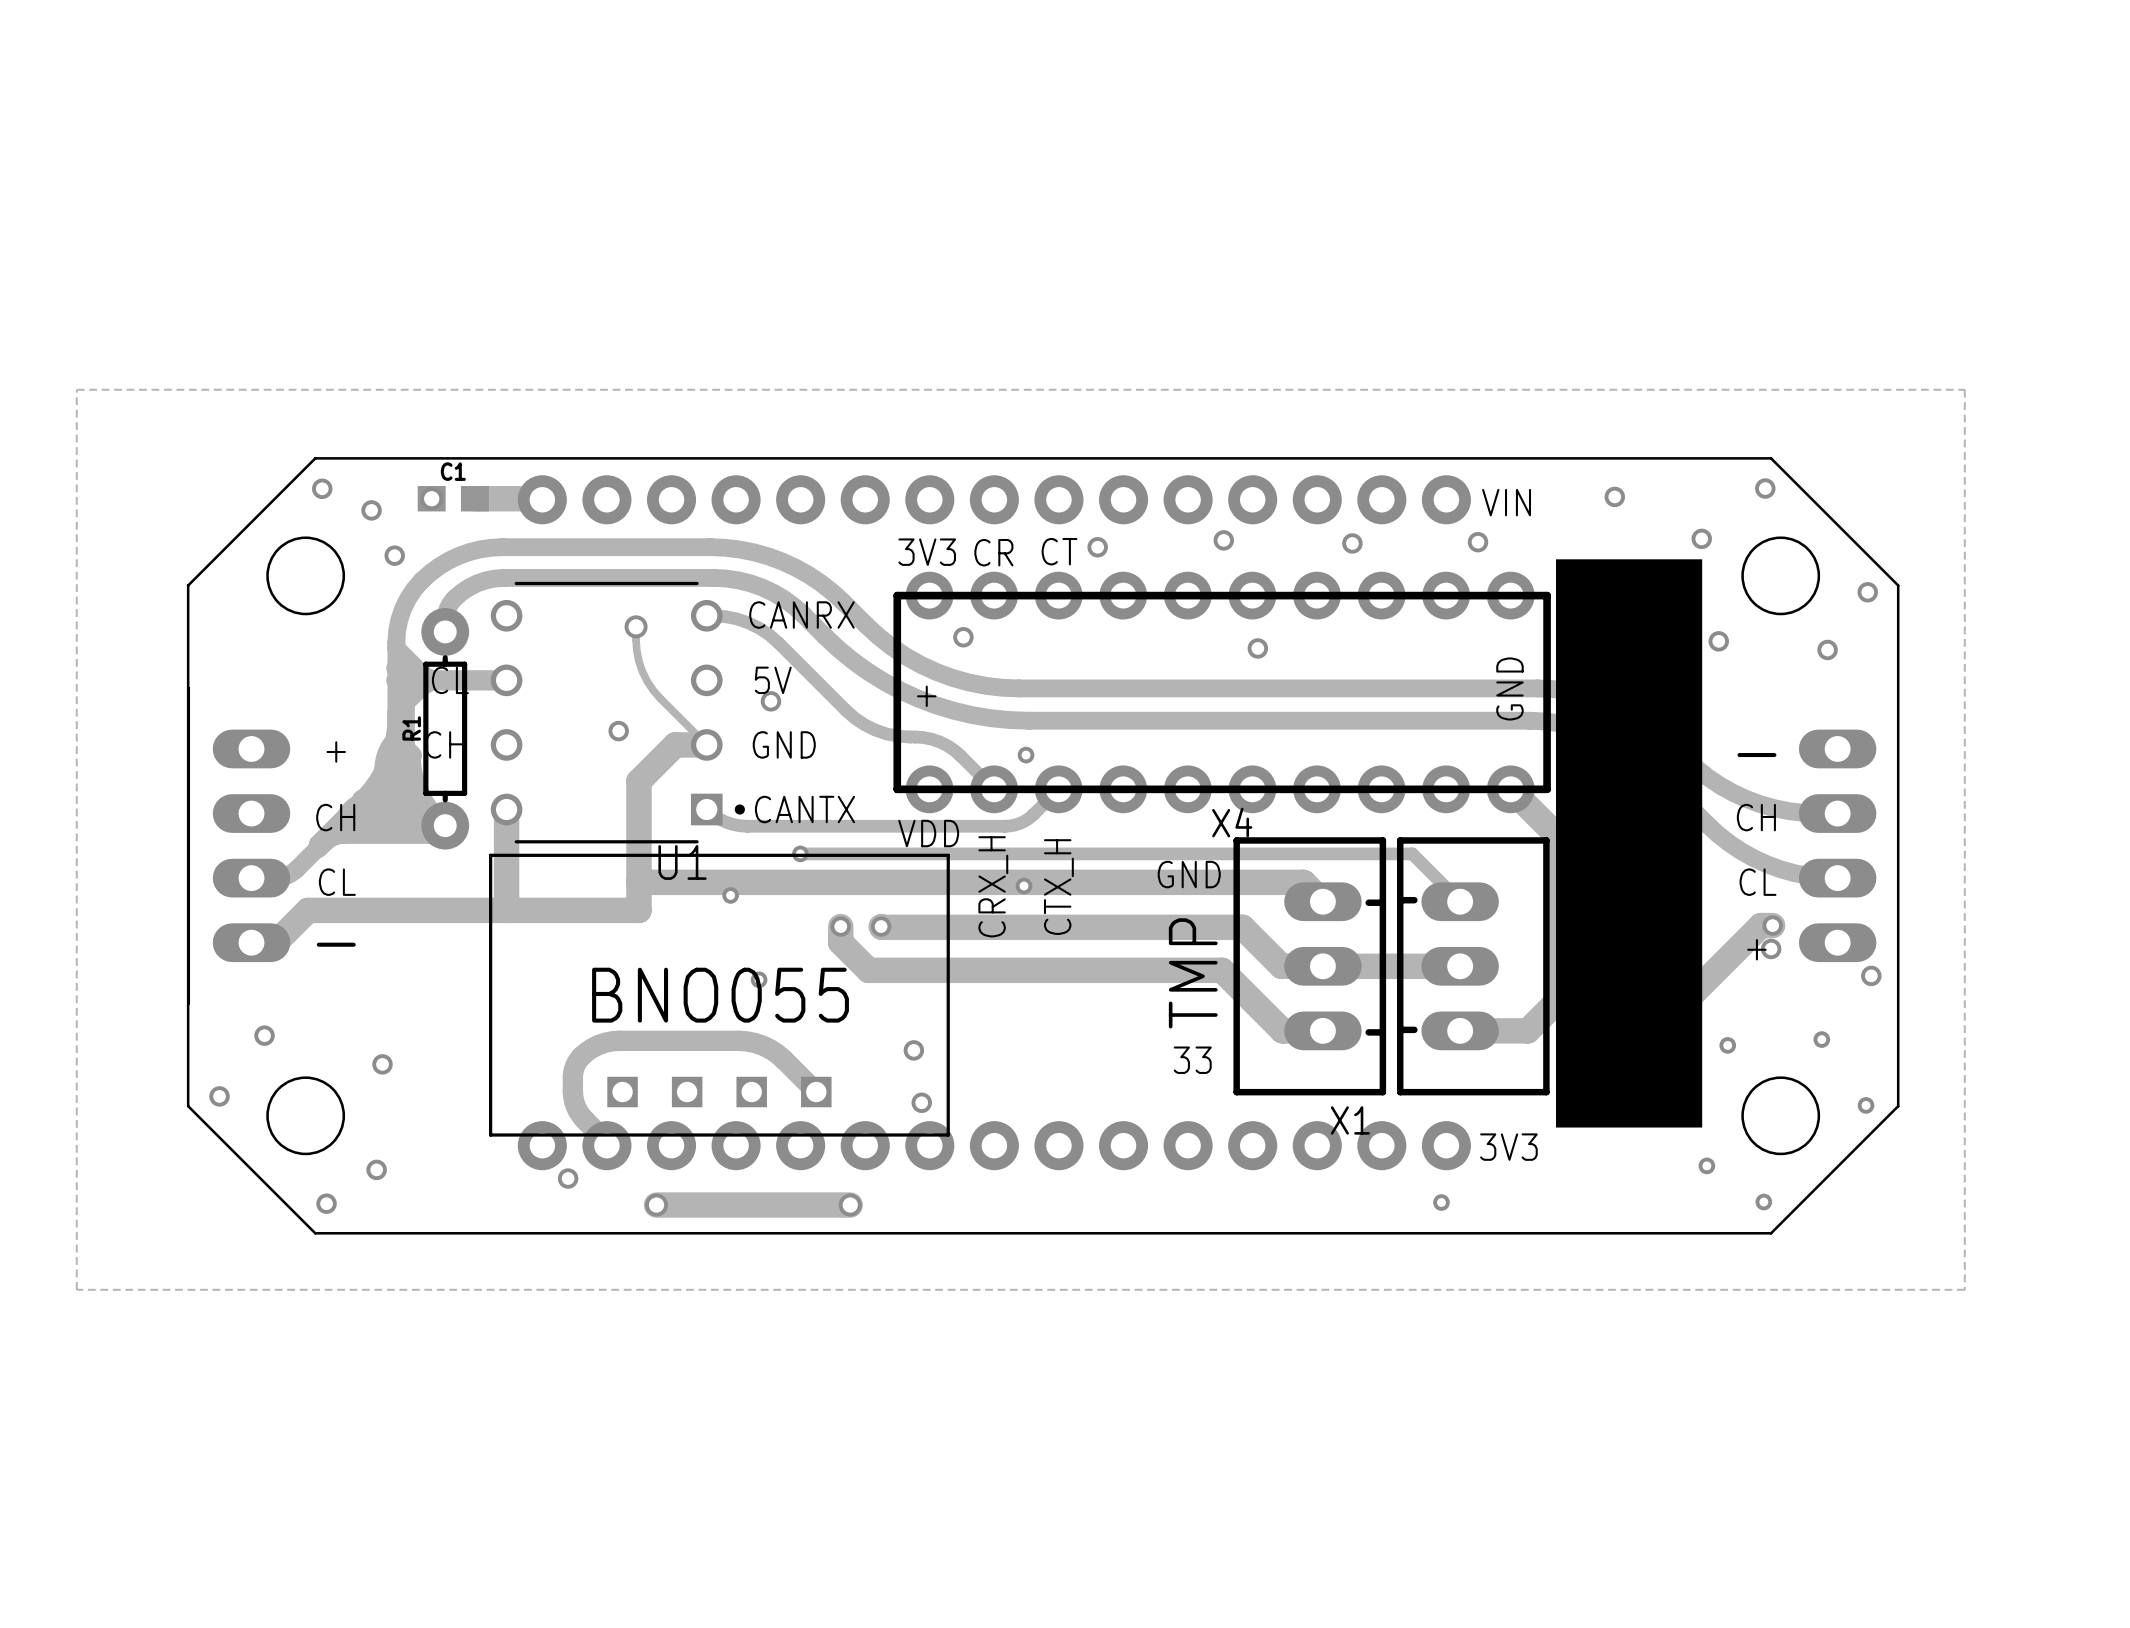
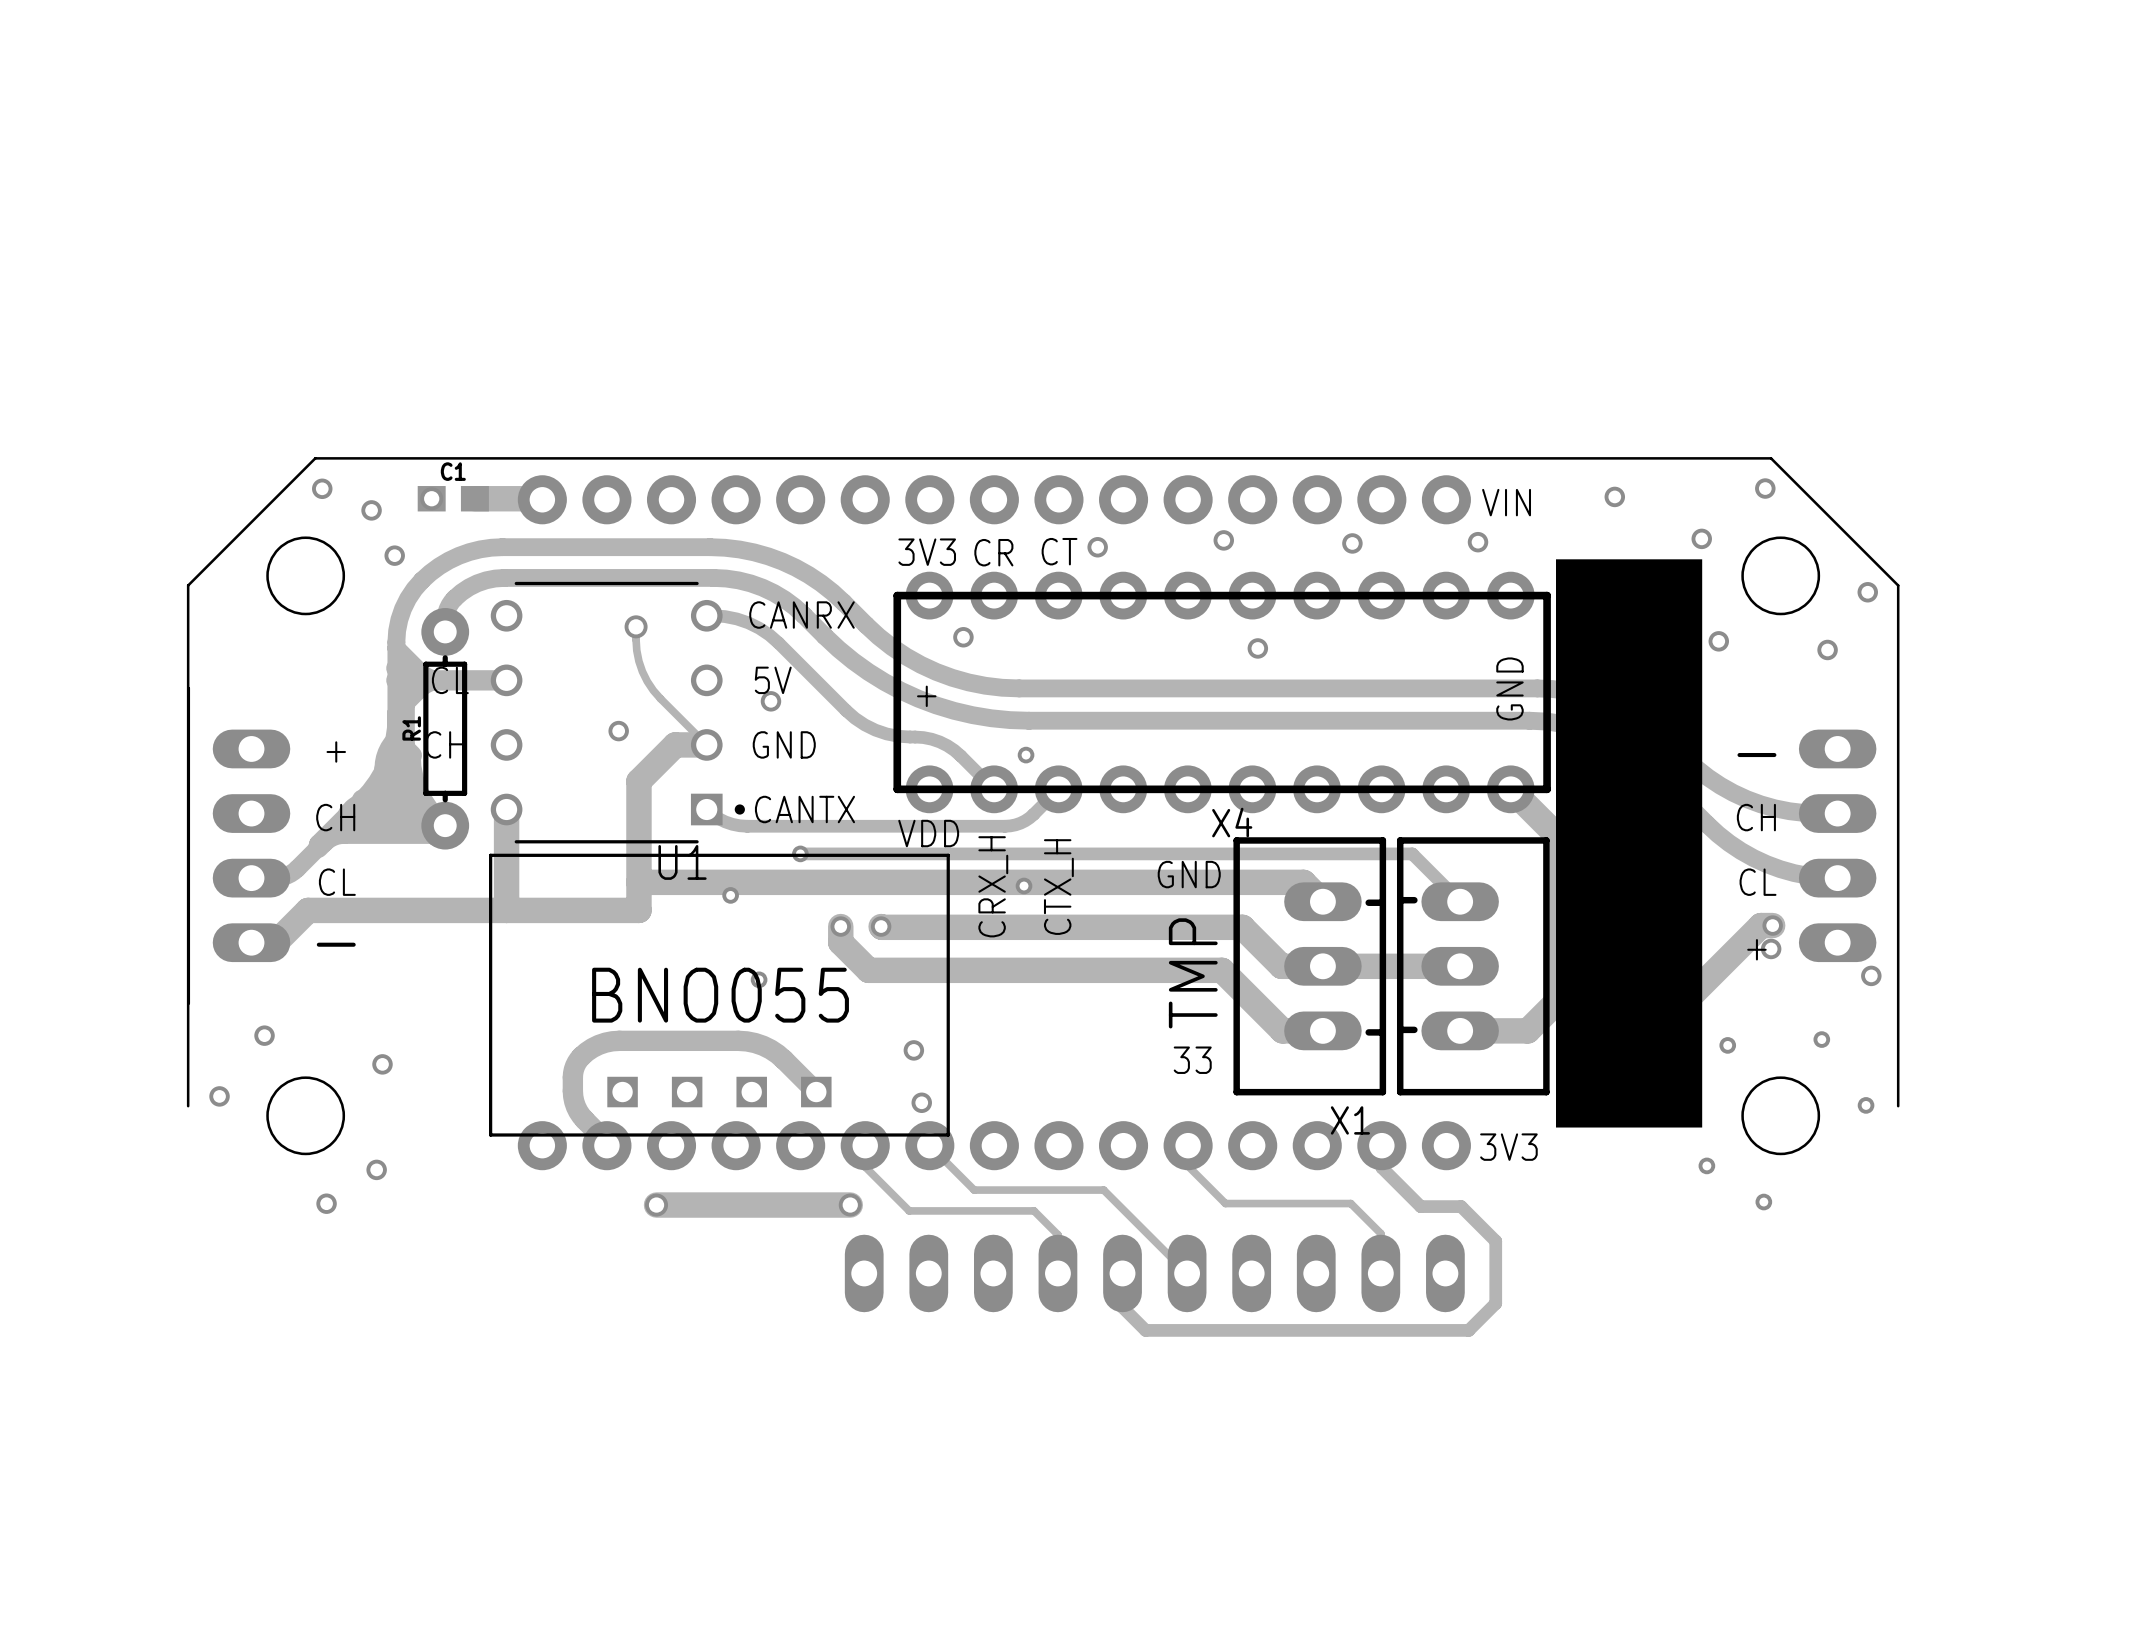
zone outline: (1964, 389) (1964, 1289) (76, 1289) (76, 389) (1964, 389) -> none
board edge: (1898, 1106) (1771, 1233) (315, 1233) (188, 1106) -> none
track: none -> (865, 1145) (865, 1166) (909, 1210) (1034, 1210) (1057, 1234) (1057, 1273)
track: none -> (929, 1145) (974, 1190) (1103, 1190) (1187, 1273)
track: none -> (1188, 1145) (1188, 1166) (1225, 1203) (1350, 1203) (1380, 1233) (1380, 1273)
track: none -> (1381, 1145) (1381, 1167) (1420, 1206) (1461, 1206) (1495, 1241) (1495, 1303) (1468, 1330) (1145, 1330) (1122, 1307) (1122, 1273)
via: (568, 1178) -> none
via: (1441, 1202) -> none
part: none -> (1154, 1273)

